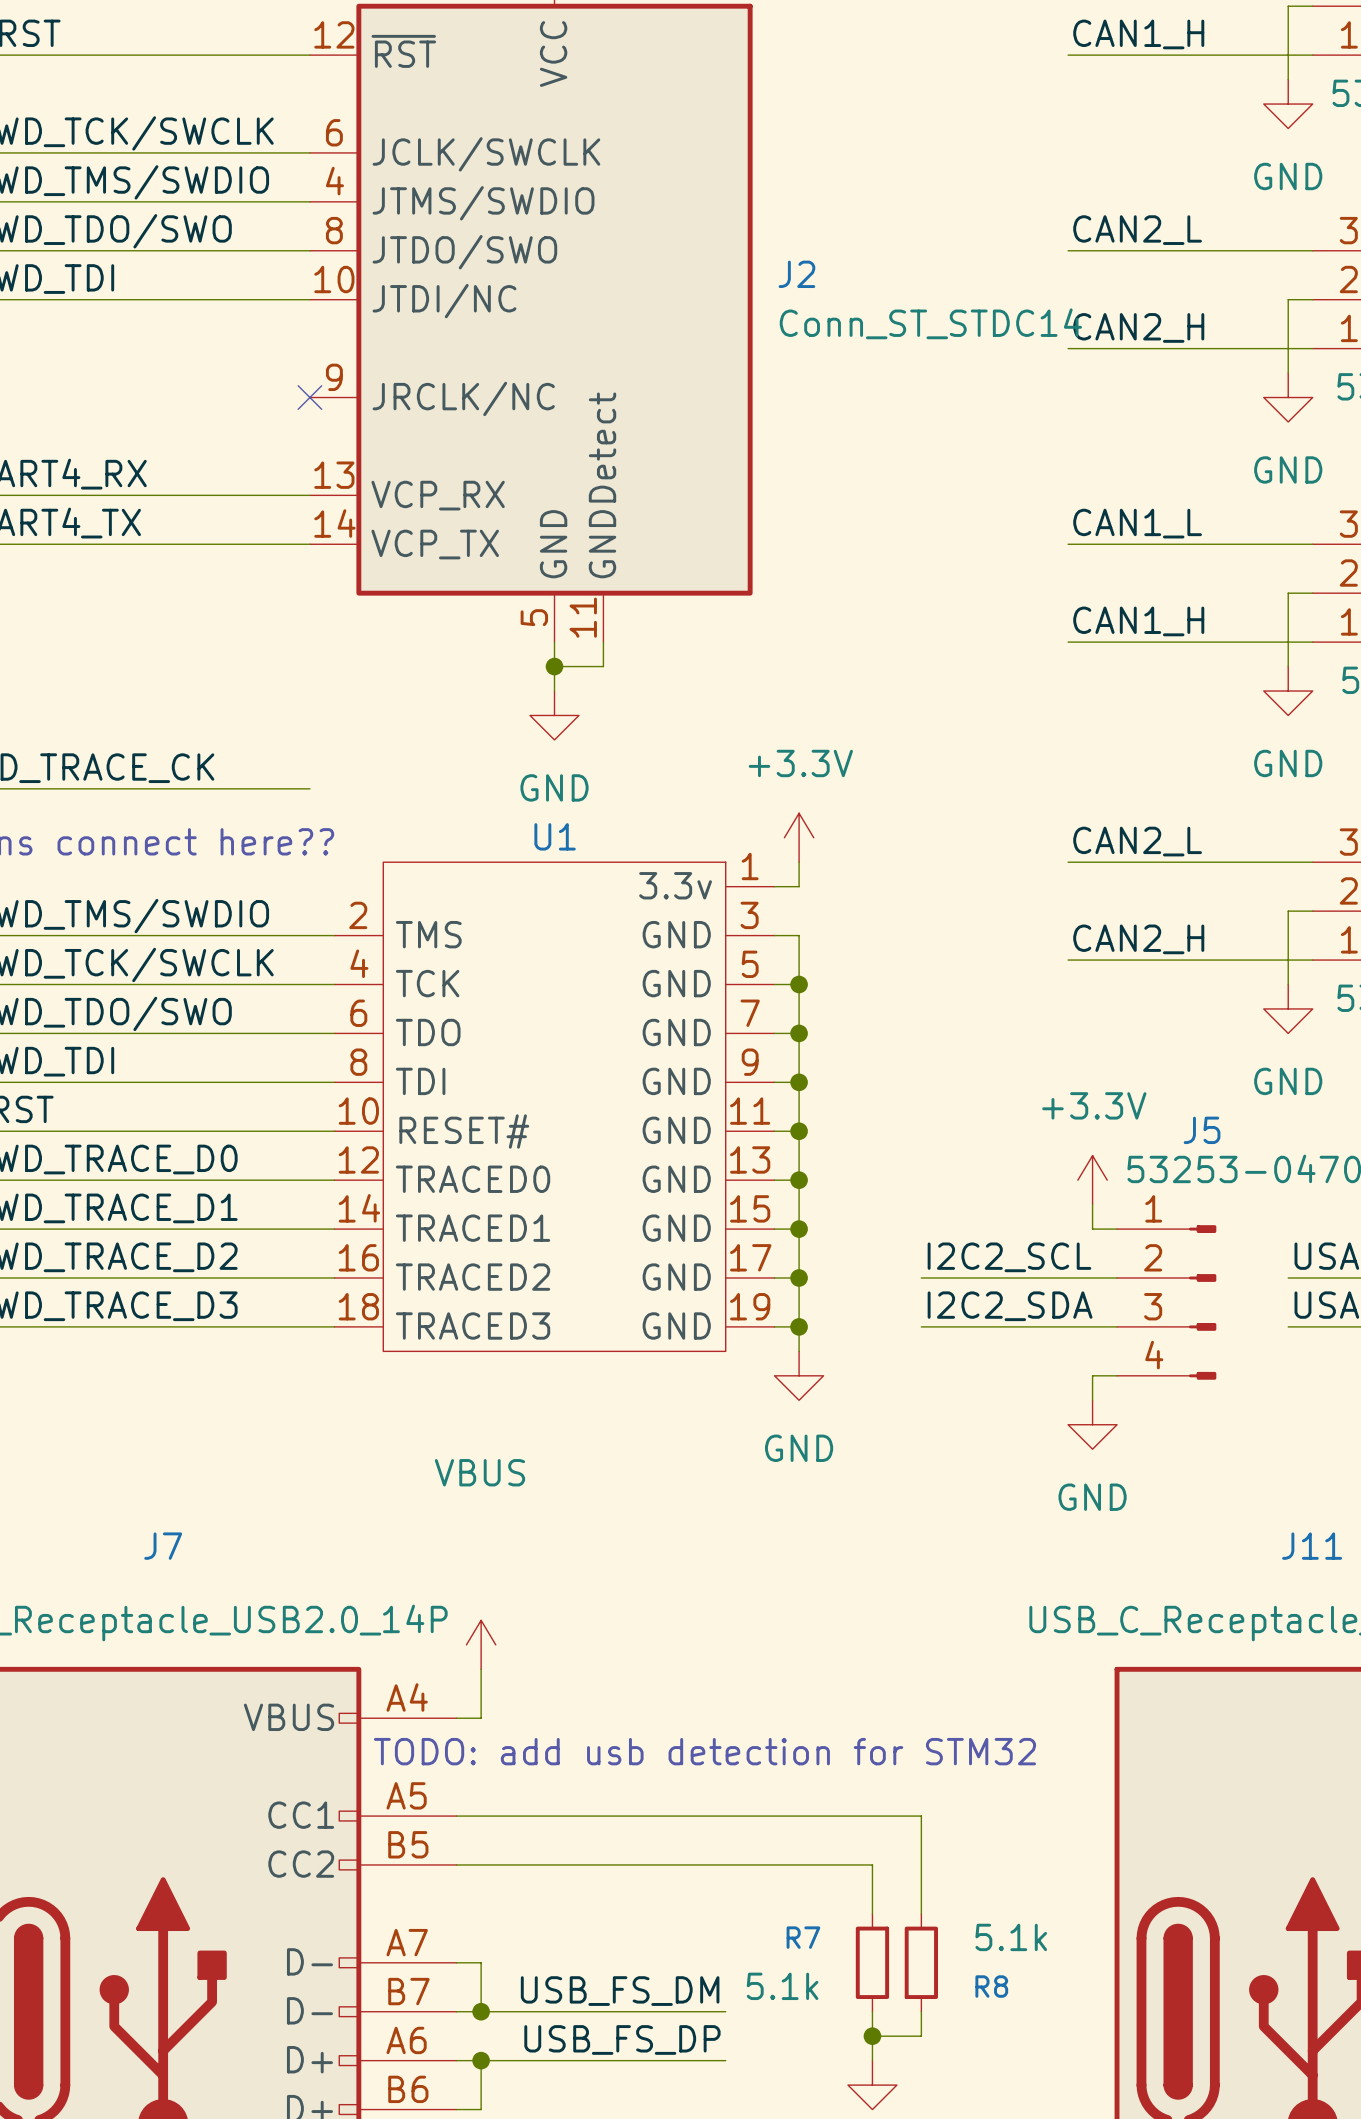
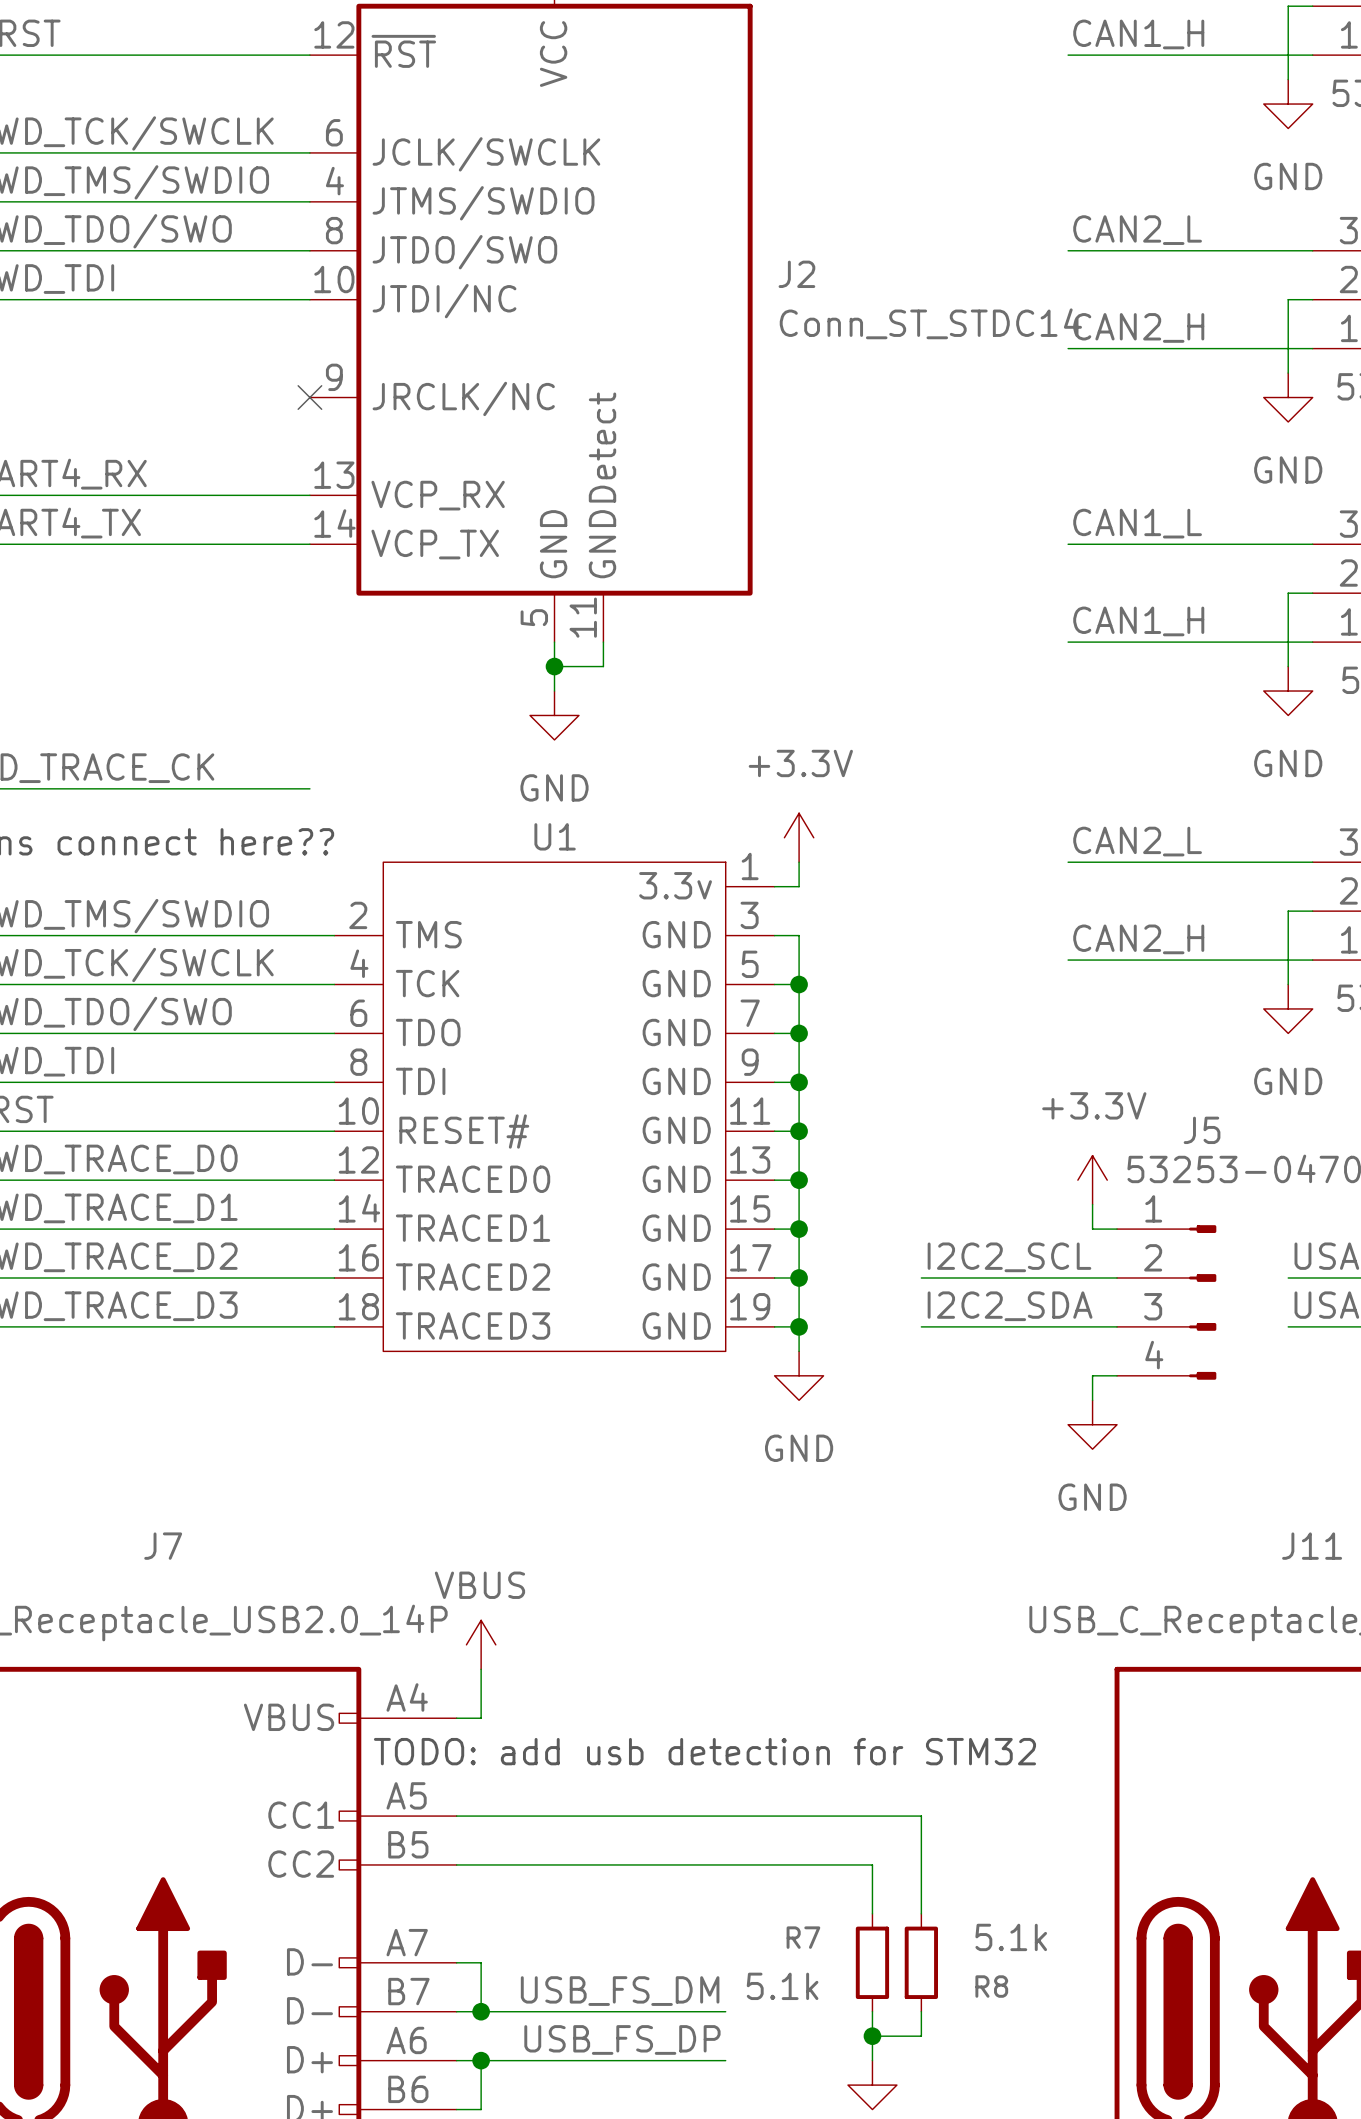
power symbol text position: VBUS (479, 1472) -> VBUS (479, 1585)

